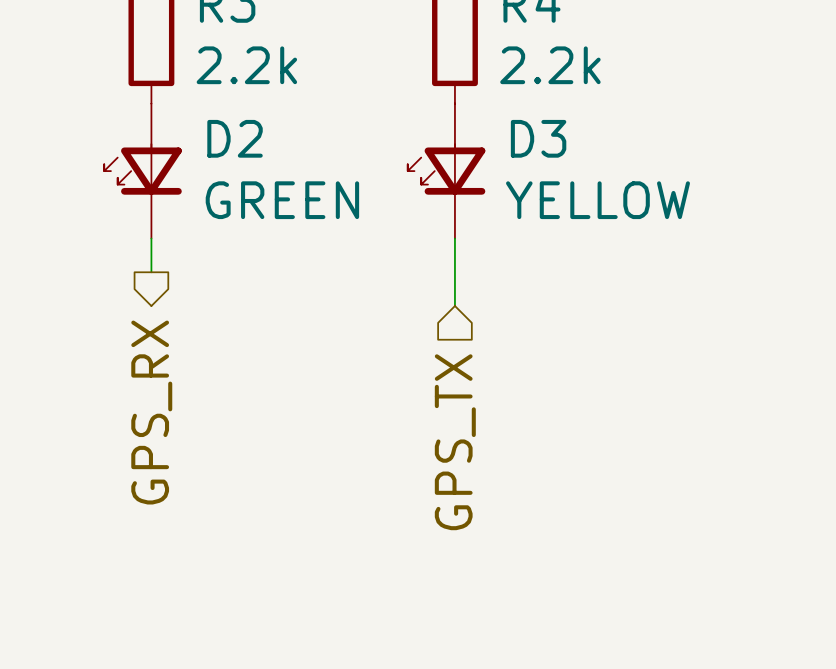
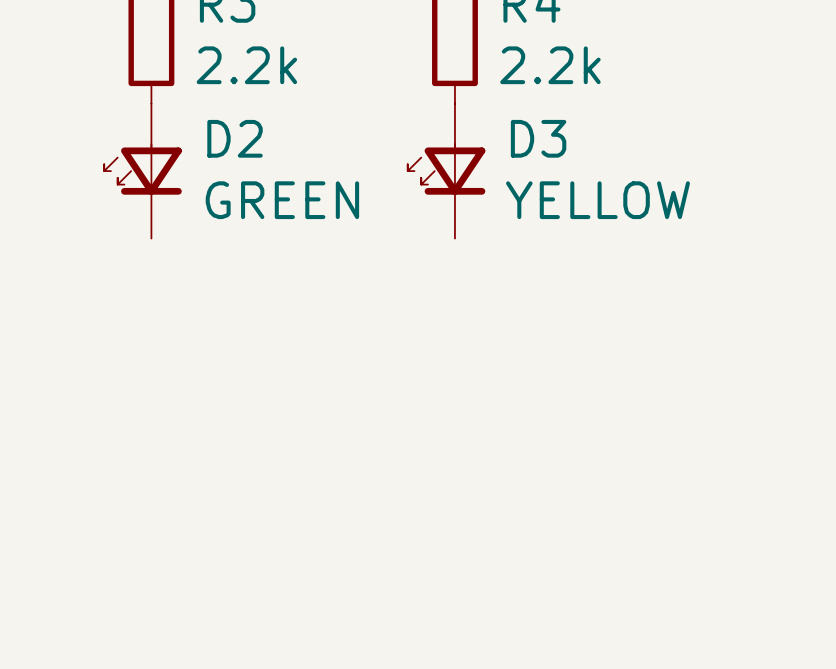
wire: (151, 238) (151, 272) -> none
wire: (454, 238) (454, 306) -> none
hierarchical label: GPS_RX (151, 412) -> none
hierarchical label: GPS_TX (455, 442) -> none

